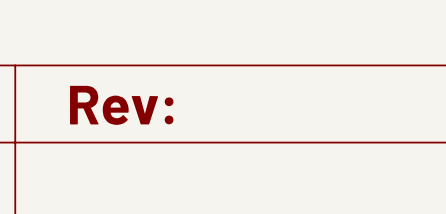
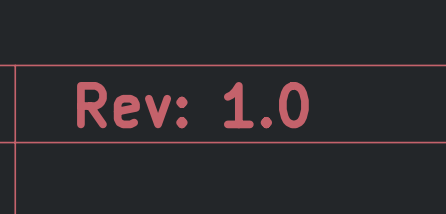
title block: Rev: (121, 105) -> Rev: 1.0 (192, 105)

